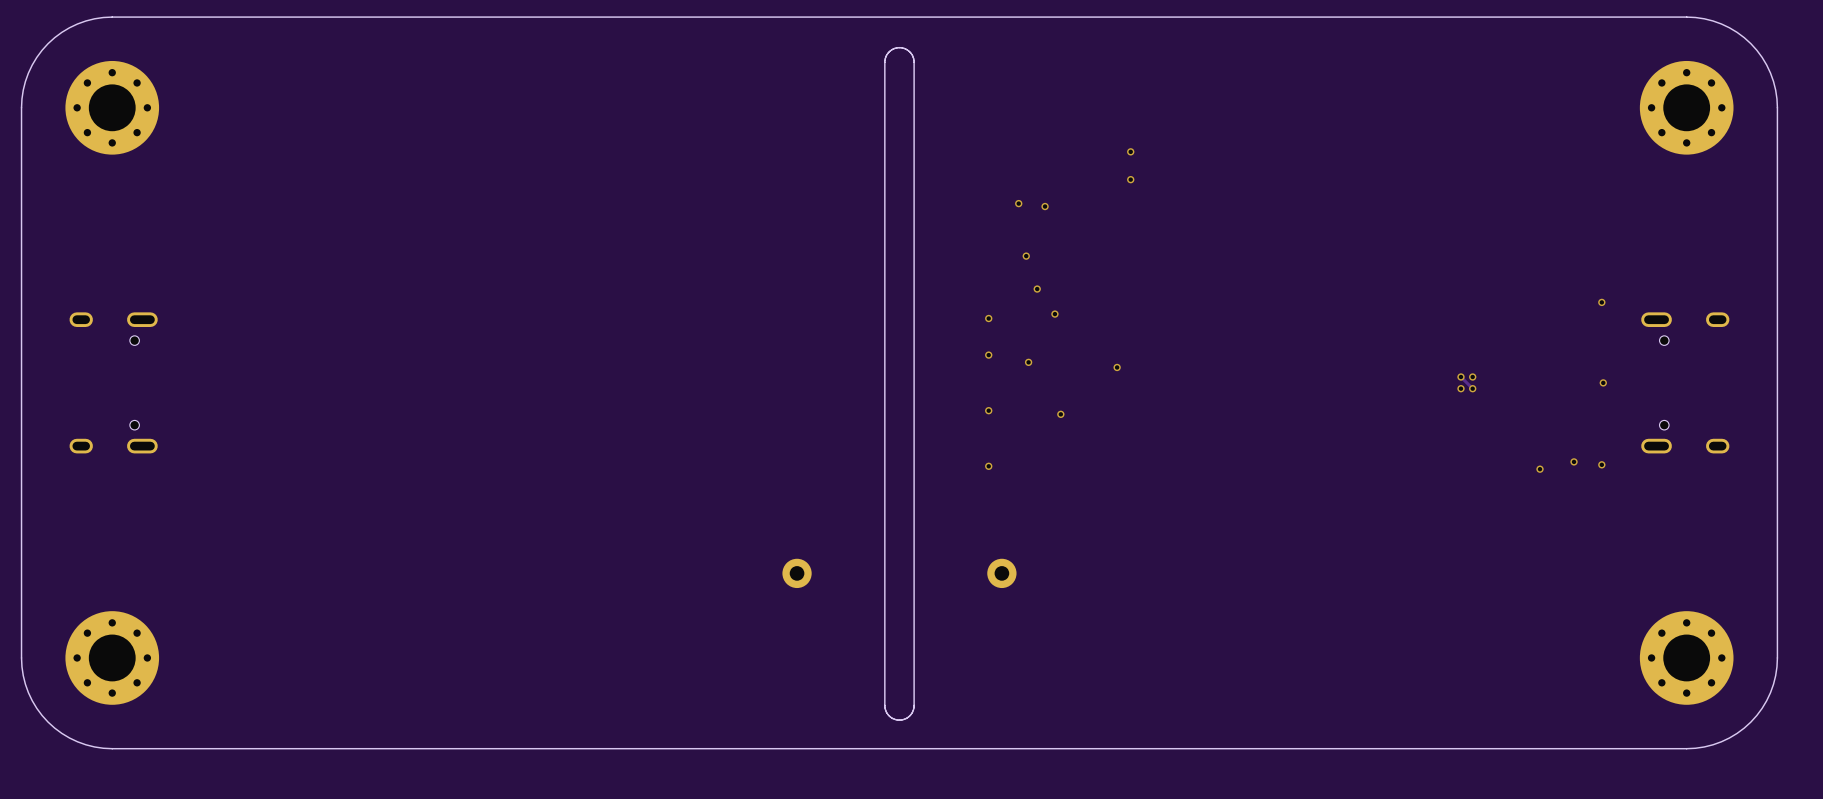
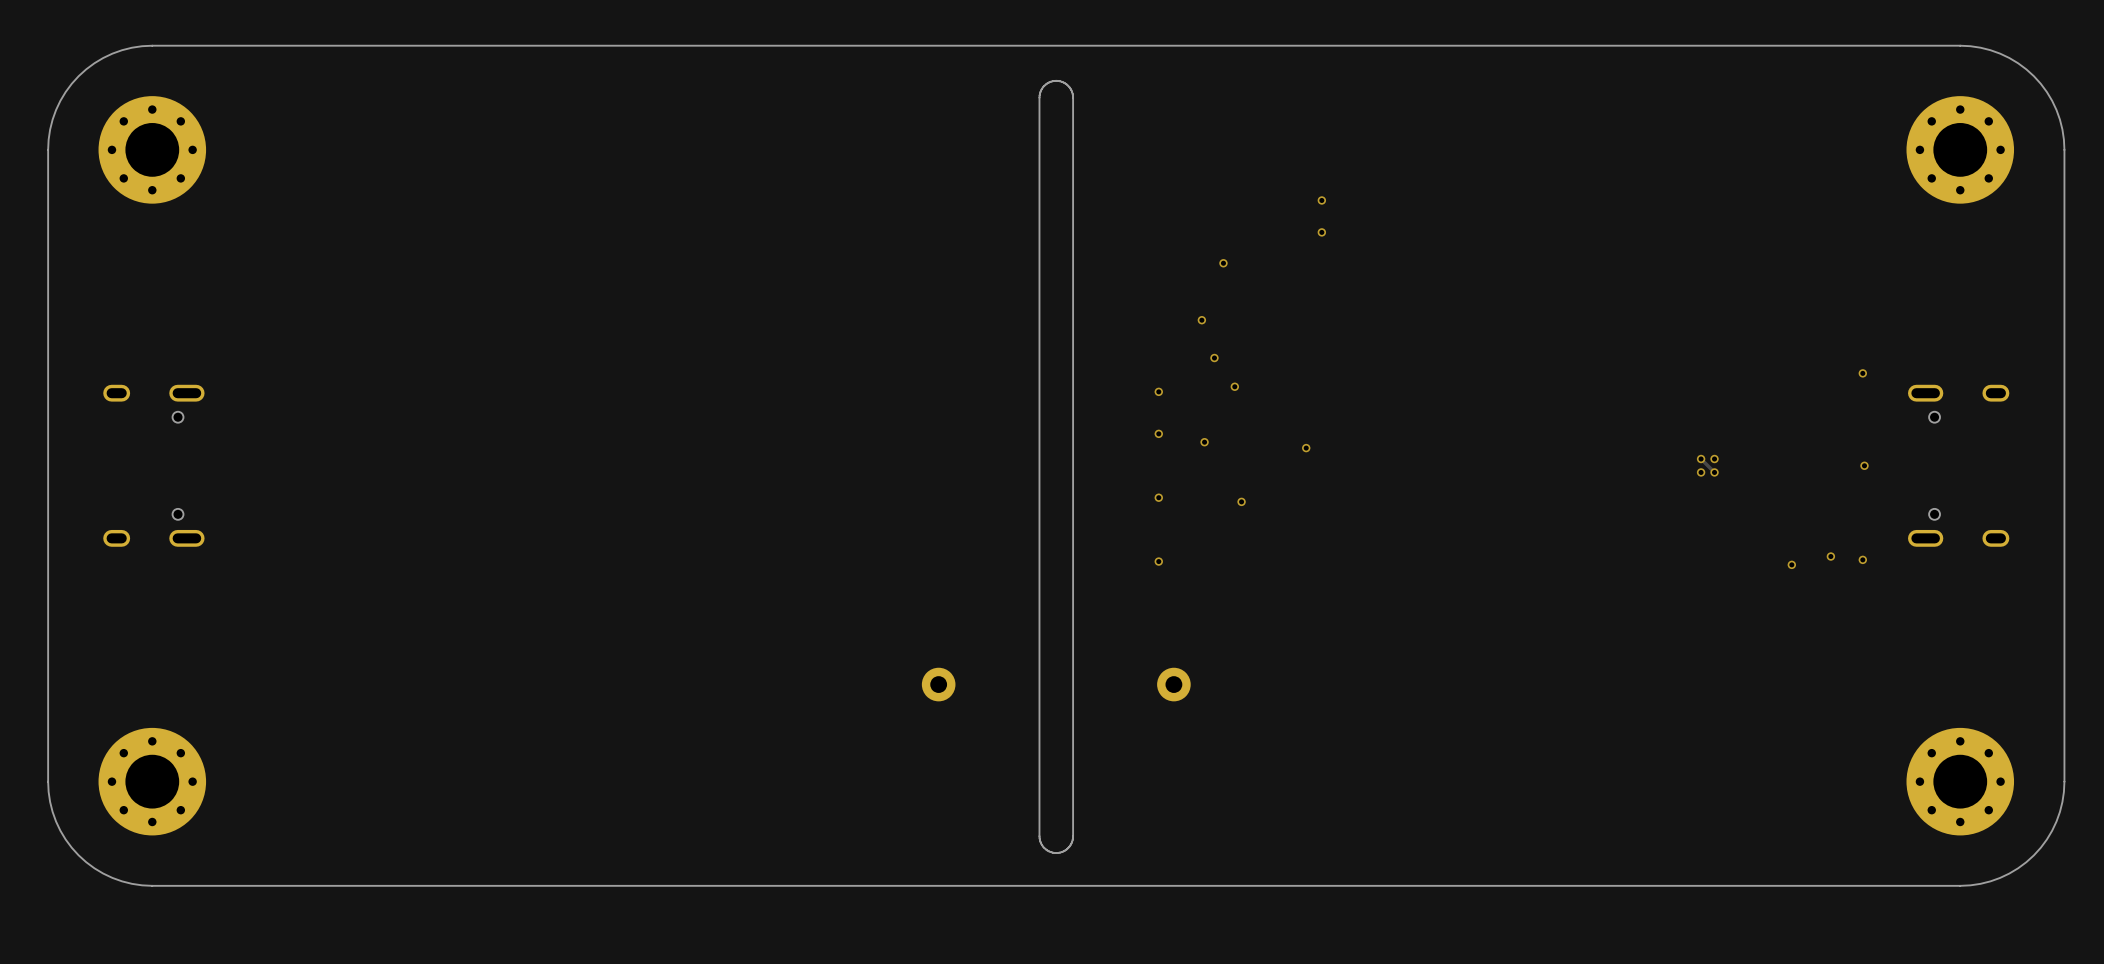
via: (1018, 203) -> none

